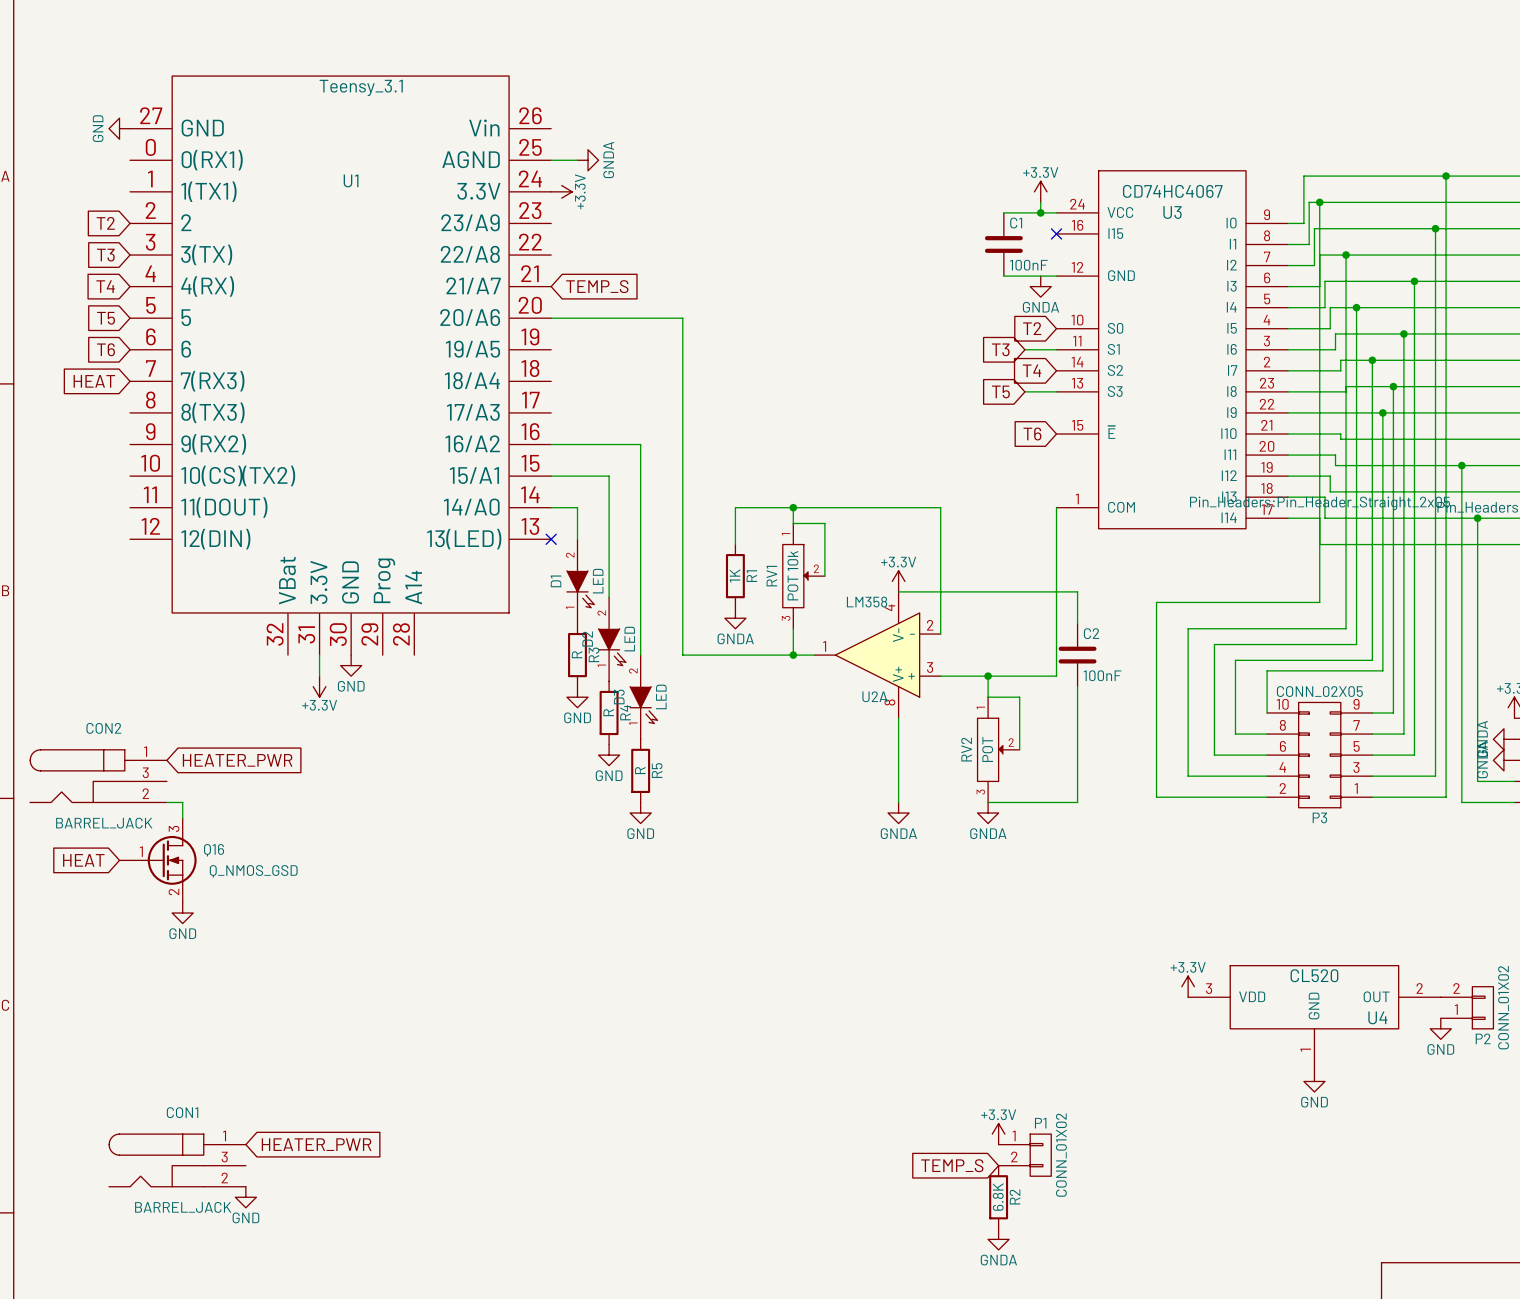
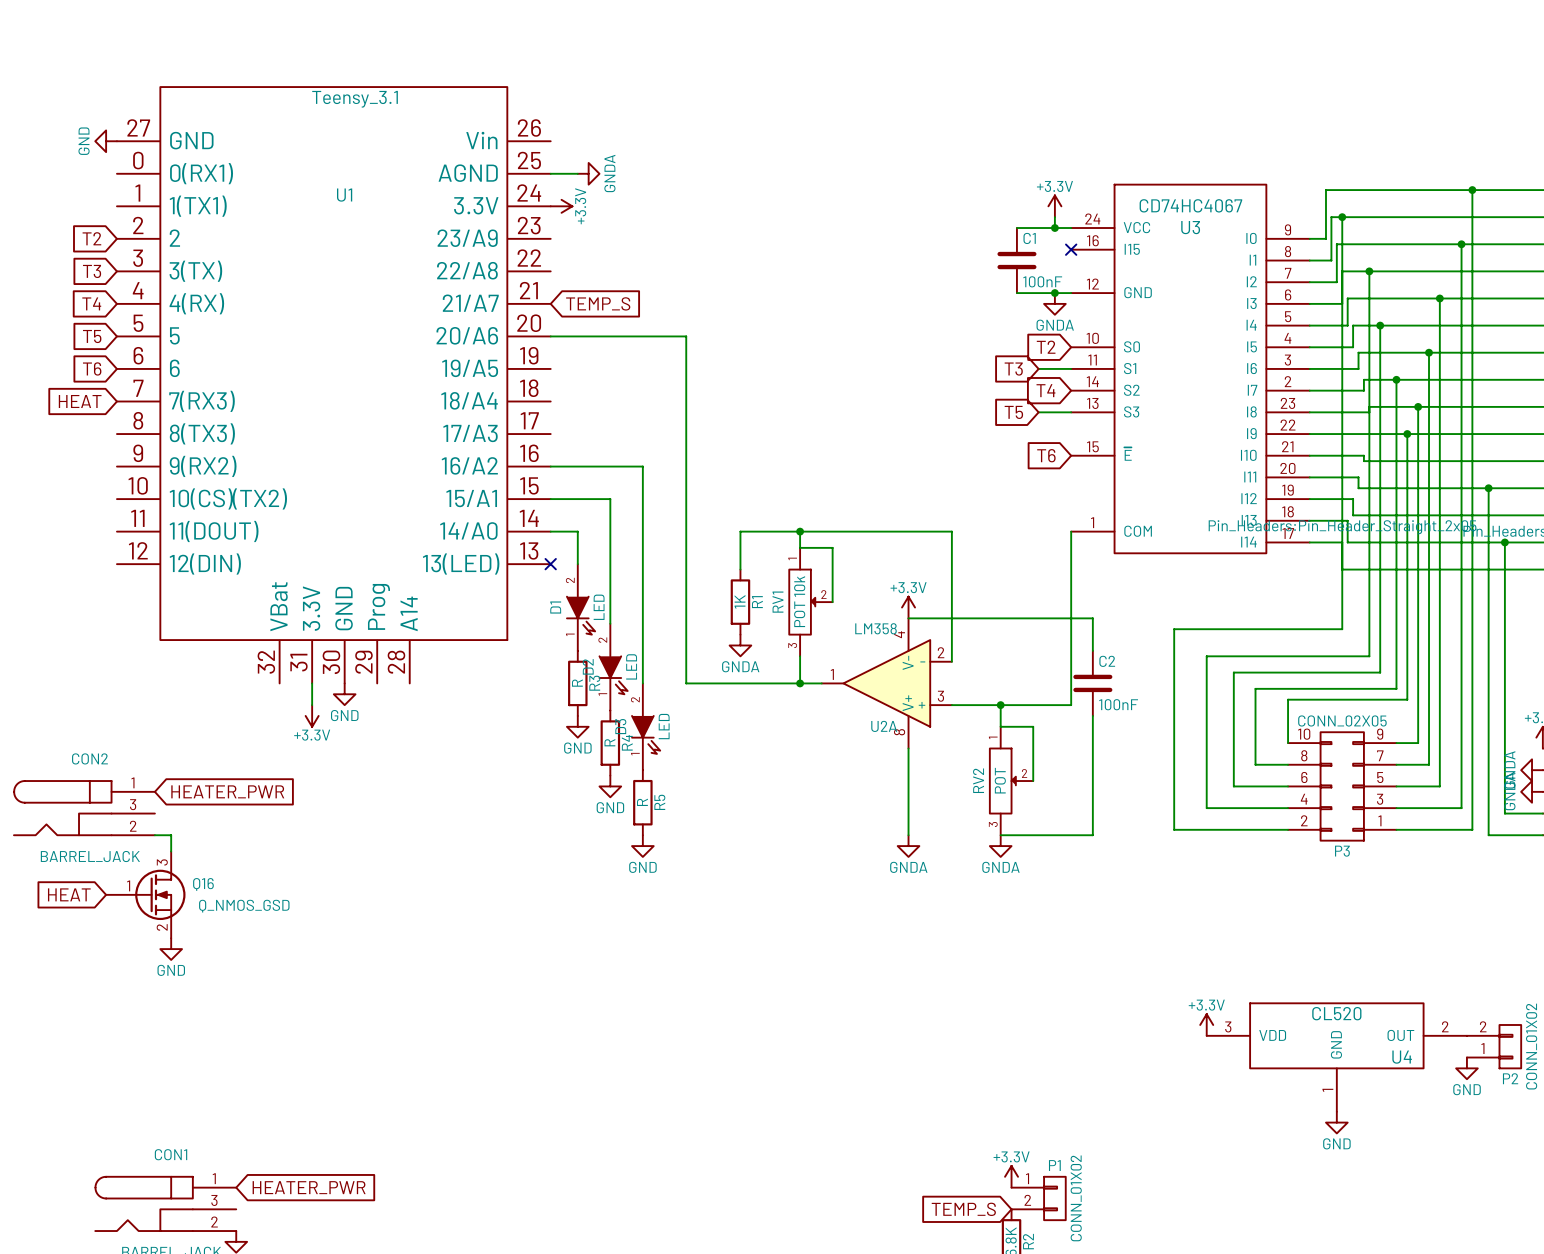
junction: none -> (1054, 293)

